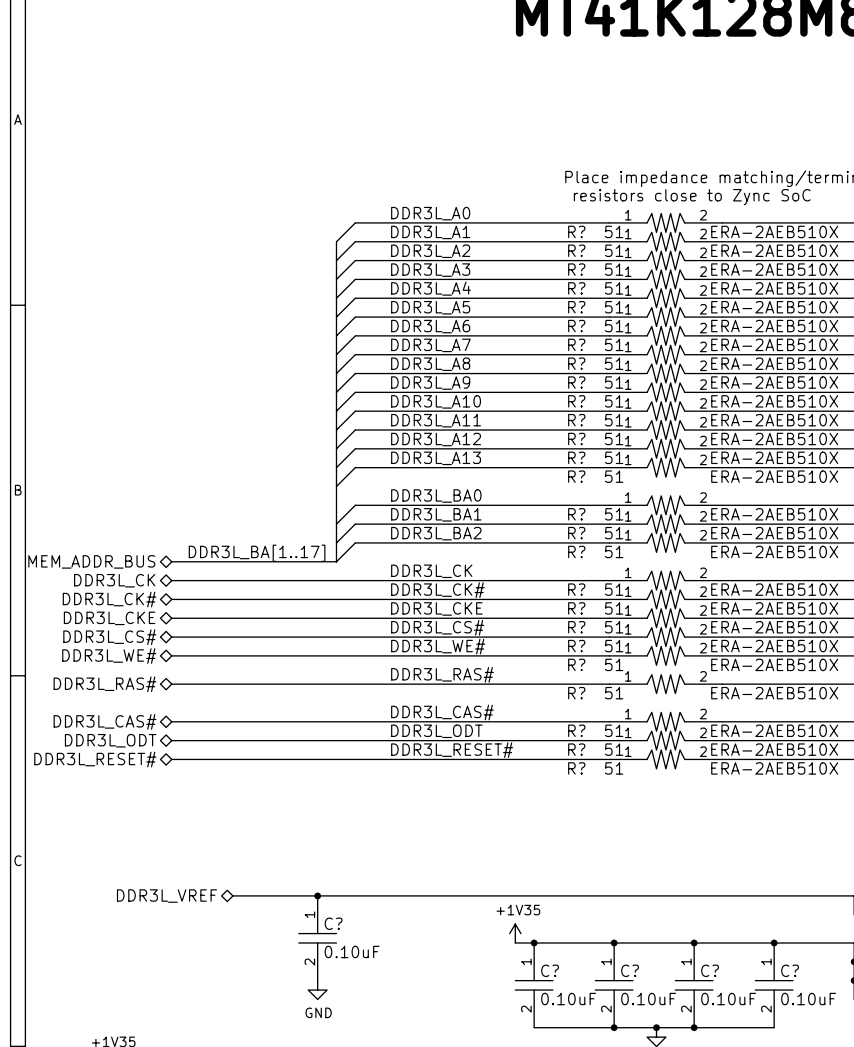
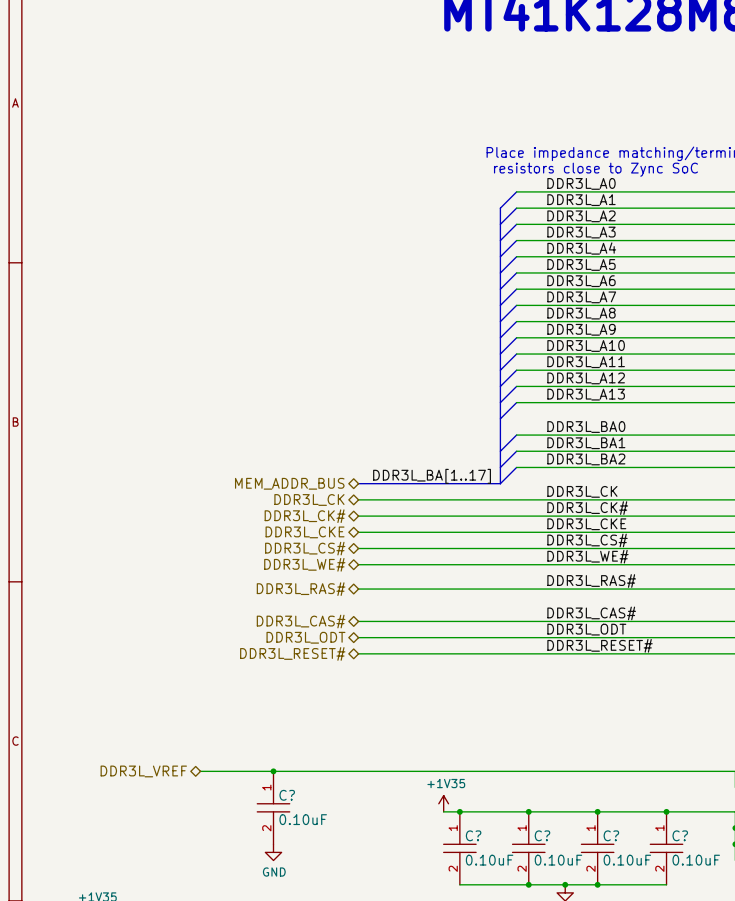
label: DDR3L_A0 (430, 213) -> none
label: none -> DDR3L_A0 (581, 183)
bus: (355, 222) (336, 241) (336, 298) -> none
wire: (355, 222) (600, 222) -> none
bus: none -> (516, 191) (500, 208) (500, 483)
R?: ERA-2AEB510X (665, 222) -> none
label: DDR3L_A1 (430, 232) -> none
label: none -> DDR3L_A1 (581, 200)
bus: (355, 241) (336, 260) -> none
wire: (355, 241) (600, 241) -> none
bus: none -> (516, 208) (500, 224)
R?: ERA-2AEB510X (665, 241) -> none
label: DDR3L_A2 (430, 251) -> none
label: none -> DDR3L_A2 (581, 216)
bus: (355, 260) (336, 279) -> none
wire: (355, 260) (600, 260) -> none
bus: none -> (516, 224) (500, 240)
R?: ERA-2AEB510X (665, 260) -> none
label: DDR3L_A3 (430, 270) -> none
label: none -> DDR3L_A3 (581, 232)
bus: (355, 279) (336, 298) -> none
wire: (355, 279) (600, 279) -> none
bus: none -> (516, 240) (500, 256)
R?: ERA-2AEB510X (665, 279) -> none
label: DDR3L_A4 (430, 288) -> none
label: none -> DDR3L_A4 (581, 248)
bus: (336, 298) (336, 561) -> none
bus: (355, 298) (336, 317) -> none
wire: (355, 298) (600, 298) -> none
bus: none -> (516, 256) (500, 272)
R?: ERA-2AEB510X (665, 298) -> none
label: DDR3L_A5 (430, 307) -> none
label: none -> DDR3L_A5 (581, 264)
bus: (355, 317) (336, 335) -> none
wire: (355, 317) (600, 317) -> none
bus: none -> (516, 272) (500, 289)
R?: ERA-2AEB510X (665, 317) -> none
label: DDR3L_A6 (430, 326) -> none
label: none -> DDR3L_A6 (581, 281)
bus: (355, 335) (336, 354) -> none
wire: (355, 335) (600, 335) -> none
bus: none -> (516, 289) (500, 305)
R?: ERA-2AEB510X (665, 335) -> none
label: DDR3L_A7 (430, 345) -> none
label: none -> DDR3L_A7 (581, 297)
bus: (355, 354) (336, 373) -> none
wire: (355, 354) (600, 354) -> none
bus: none -> (516, 305) (500, 321)
R?: ERA-2AEB510X (665, 354) -> none
label: DDR3L_A8 (430, 364) -> none
label: none -> DDR3L_A8 (581, 313)
bus: (355, 373) (336, 392) -> none
wire: (355, 373) (600, 373) -> none
bus: none -> (516, 321) (500, 337)
R?: ERA-2AEB510X (665, 373) -> none
label: DDR3L_A9 (430, 383) -> none
label: none -> DDR3L_A9 (581, 329)
bus: (355, 392) (336, 411) -> none
wire: (355, 392) (600, 392) -> none
bus: none -> (516, 337) (500, 354)
R?: ERA-2AEB510X (665, 392) -> none
label: DDR3L_A10 (436, 401) -> none
label: none -> DDR3L_A10 (586, 345)
bus: (355, 411) (336, 430) -> none
wire: (355, 411) (600, 411) -> none
bus: none -> (516, 354) (500, 370)
R?: ERA-2AEB510X (665, 411) -> none
label: DDR3L_A11 (436, 420) -> none
label: none -> DDR3L_A11 (586, 362)
bus: (355, 430) (336, 448) -> none
wire: (355, 430) (600, 430) -> none
bus: none -> (516, 370) (500, 386)
R?: ERA-2AEB510X (665, 430) -> none
label: DDR3L_A12 (436, 439) -> none
label: none -> DDR3L_A12 (586, 378)
bus: (355, 448) (336, 467) -> none
wire: (355, 448) (600, 448) -> none
bus: none -> (516, 386) (500, 402)
R?: ERA-2AEB510X (665, 448) -> none
label: DDR3L_A13 (436, 458) -> none
label: none -> DDR3L_A13 (586, 394)
bus: (355, 467) (336, 486) -> none
wire: (355, 467) (600, 467) -> none
bus: none -> (516, 402) (500, 418)
R?: ERA-2AEB510X (665, 467) -> none
label: DDR3L_BA0 (436, 495) -> none
label: none -> DDR3L_BA0 (586, 427)
bus: (355, 505) (336, 524) -> none
wire: (355, 505) (600, 505) -> none
bus: none -> (516, 435) (500, 451)
R?: ERA-2AEB510X (665, 505) -> none
label: DDR3L_BA1 (436, 514) -> none
label: none -> DDR3L_BA1 (586, 443)
bus: (355, 524) (336, 542) -> none
wire: (355, 524) (600, 524) -> none
bus: none -> (516, 451) (500, 467)
R?: ERA-2AEB510X (665, 524) -> none
label: DDR3L_BA2 (436, 533) -> DDR3L_BA[1..17] (432, 476)
label: none -> DDR3L_BA2 (586, 459)
bus: (355, 542) (336, 561) -> none
wire: (355, 542) (600, 542) -> none
bus: none -> (516, 467) (500, 483)
R?: ERA-2AEB510X (665, 542) -> none
label: DDR3L_BA[1..17] (257, 553) -> none
hierarchical label: MEM_ADDR_BUS (91, 561) -> none
bus: (171, 561) (336, 561) -> none
hierarchical label: none -> MEM_ADDR_BUS (289, 483)
bus: none -> (358, 483) (500, 483)
label: DDR3L_CK (431, 571) -> none
label: none -> DDR3L_CK (582, 491)
hierarchical label: DDR3L_CK (114, 580) -> none
wire: (171, 580) (416, 580) -> none
hierarchical label: none -> DDR3L_CK (309, 499)
R?: ERA-2AEB510X (665, 580) -> none
label: DDR3L_CK# (437, 590) -> none
label: none -> DDR3L_CK# (587, 508)
hierarchical label: DDR3L_CK# (109, 599) -> none
wire: (171, 599) (416, 599) -> none
hierarchical label: none -> DDR3L_CK# (305, 516)
R?: ERA-2AEB510X (665, 599) -> none
label: DDR3L_CKE (436, 608) -> none
label: none -> DDR3L_CKE (586, 524)
hierarchical label: DDR3L_CKE (109, 618) -> none
wire: (171, 618) (416, 618) -> none
hierarchical label: none -> DDR3L_CKE (305, 532)
R?: ERA-2AEB510X (665, 618) -> none
label: DDR3L_CS# (437, 627) -> none
label: none -> DDR3L_CS# (587, 540)
hierarchical label: DDR3L_CS# (109, 637) -> none
wire: (171, 637) (416, 637) -> none
hierarchical label: none -> DDR3L_CS# (305, 548)
R?: ERA-2AEB510X (665, 637) -> none
label: DDR3L_WE# (438, 646) -> none
label: none -> DDR3L_WE# (587, 556)
wire: (171, 655) (416, 655) -> none
R?: ERA-2AEB510X (665, 655) -> none
hierarchical label: DDR3L_WE# (109, 656) -> none
hierarchical label: none -> DDR3L_WE# (304, 564)
label: DDR3L_RAS# (442, 674) -> none
label: none -> DDR3L_RAS# (591, 581)
hierarchical label: DDR3L_RAS# (105, 684) -> none
wire: (171, 684) (416, 684) -> none
hierarchical label: none -> DDR3L_RAS# (301, 589)
R?: ERA-2AEB510X (665, 684) -> none
label: DDR3L_CAS# (442, 712) -> none
label: none -> DDR3L_CAS# (591, 613)
hierarchical label: DDR3L_CAS# (105, 721) -> none
wire: (171, 721) (416, 721) -> none
hierarchical label: none -> DDR3L_CAS# (301, 621)
R?: ERA-2AEB510X (665, 721) -> none
label: DDR3L_ODT (436, 731) -> none
label: none -> DDR3L_ODT (586, 629)
hierarchical label: DDR3L_ODT (110, 740) -> none
wire: (171, 740) (416, 740) -> none
hierarchical label: none -> DDR3L_ODT (305, 637)
R?: ERA-2AEB510X (665, 740) -> none
label: DDR3L_RESET# (452, 750) -> none
label: none -> DDR3L_RESET# (600, 645)
hierarchical label: DDR3L_RESET# (95, 759) -> none
wire: (171, 759) (416, 759) -> none
hierarchical label: none -> DDR3L_RESET# (292, 653)
R?: ERA-2AEB510X (665, 759) -> none

